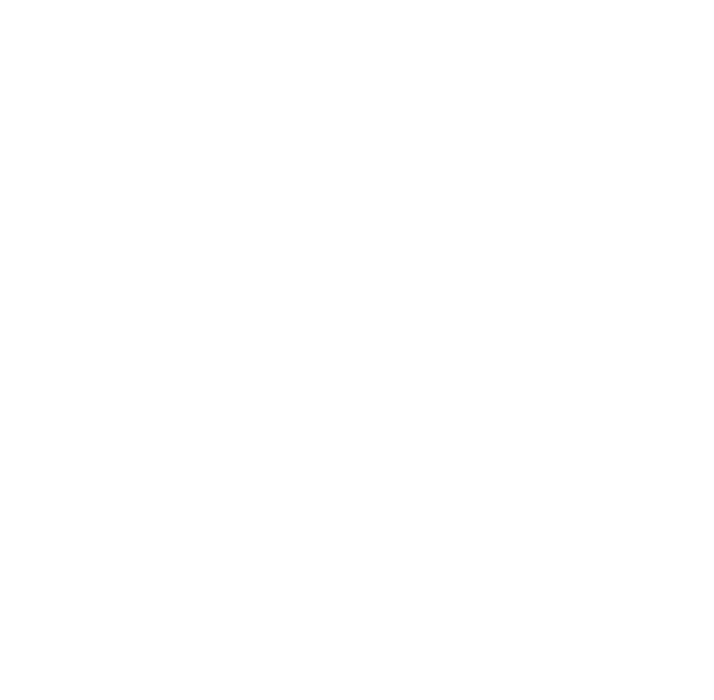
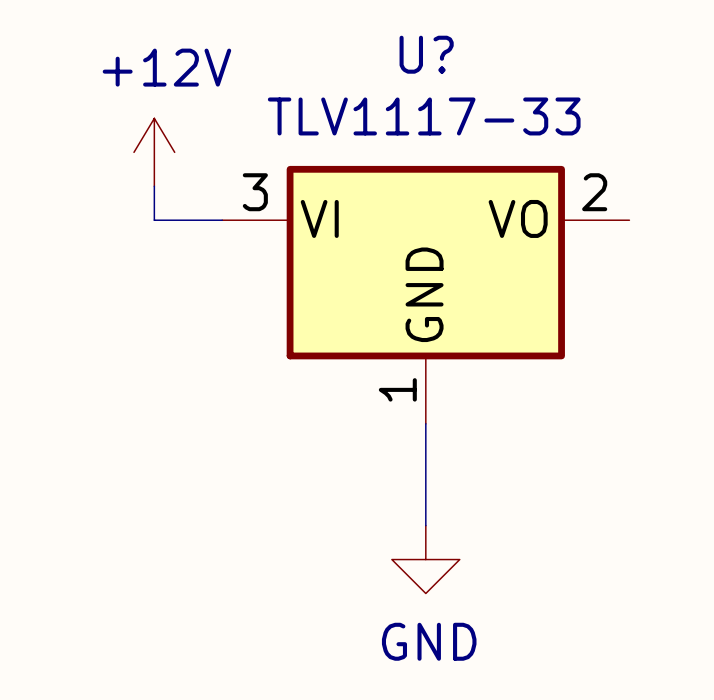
power symbol: none -> +12V (154, 152)
wire: none -> (154, 186) (154, 220) (222, 220)
U?: none -> TLV1117-33 (425, 294)
wire: none -> (425, 423) (425, 525)
power symbol: none -> GND (425, 559)

